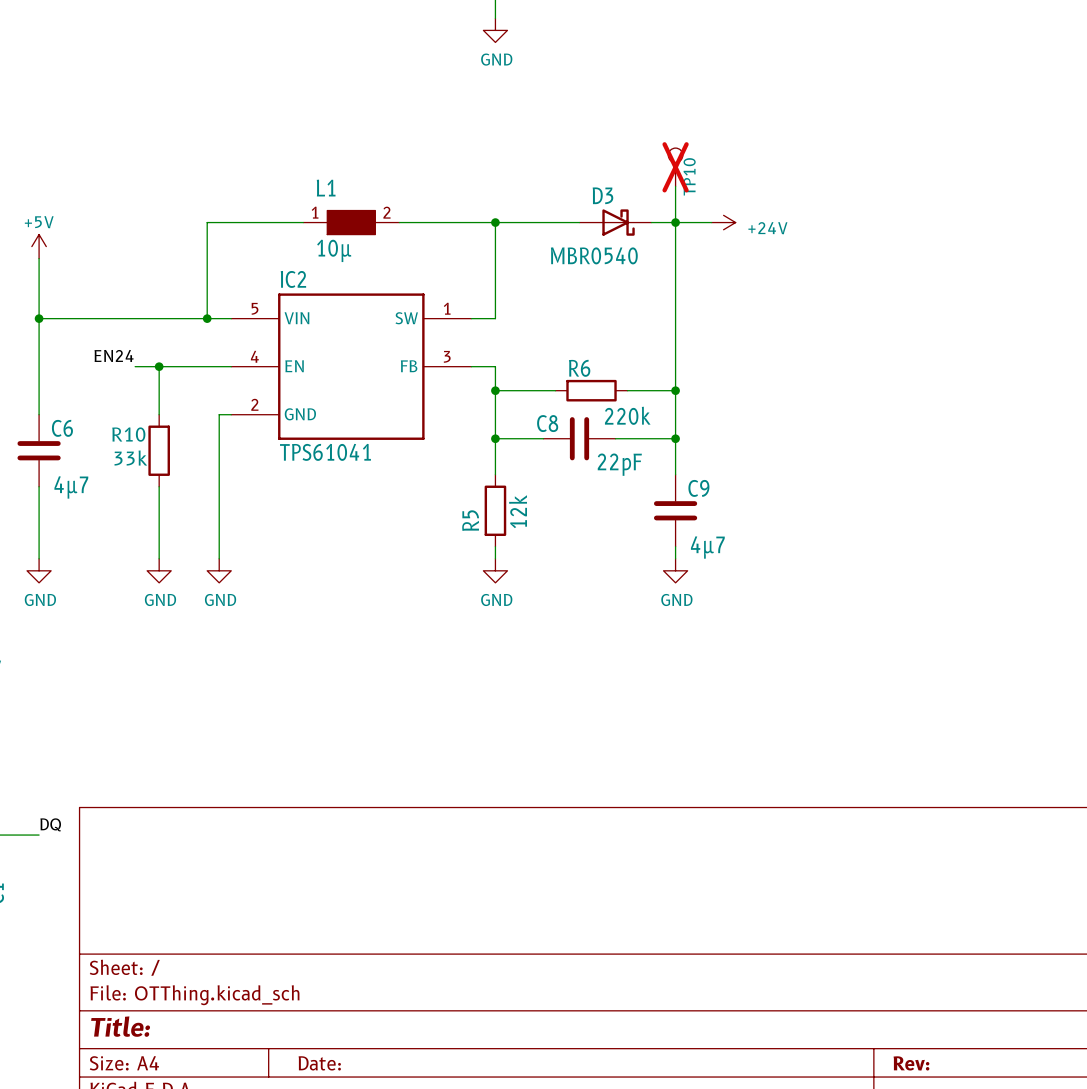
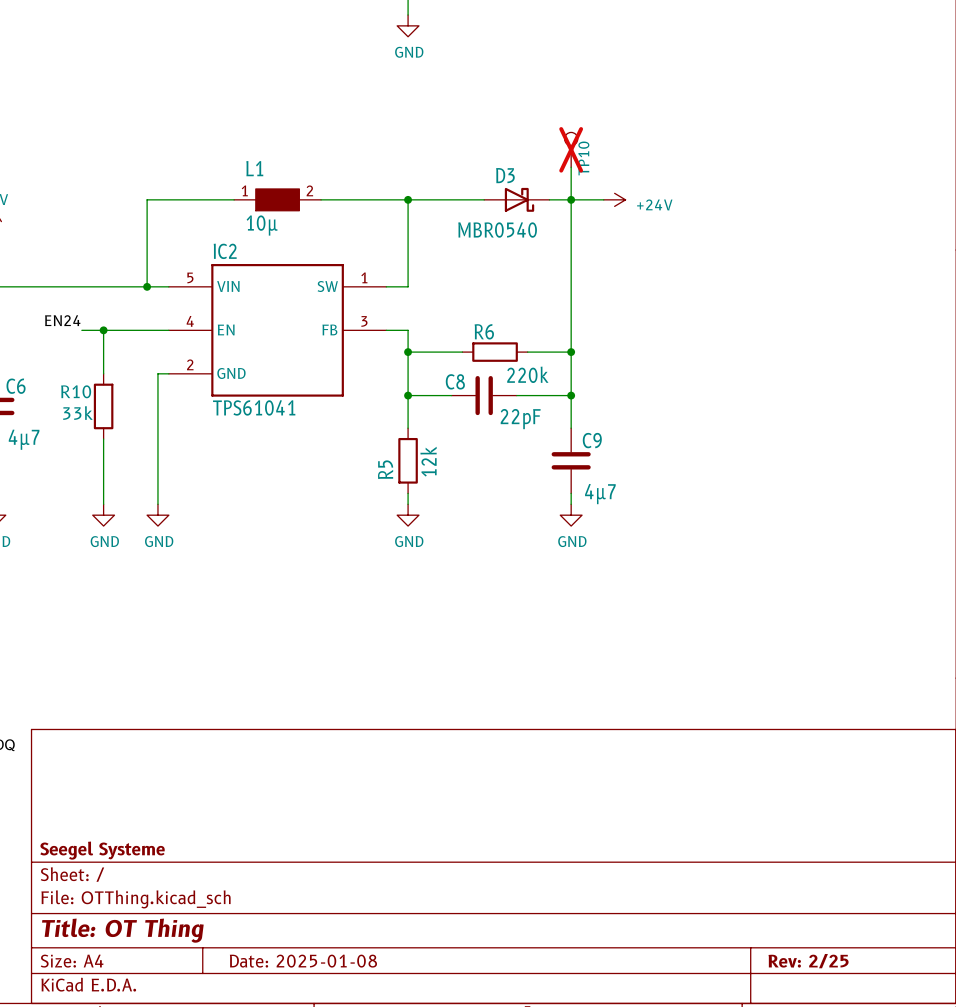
title block: none -> Seegel Systeme (102, 850)
title block: Title: (120, 1026) -> Title: OT Thing (122, 930)
title block: Date: (319, 1063) -> Date: 2025-01-08 (303, 961)
title block: Rev: (911, 1063) -> Rev: 2/25 (808, 961)

